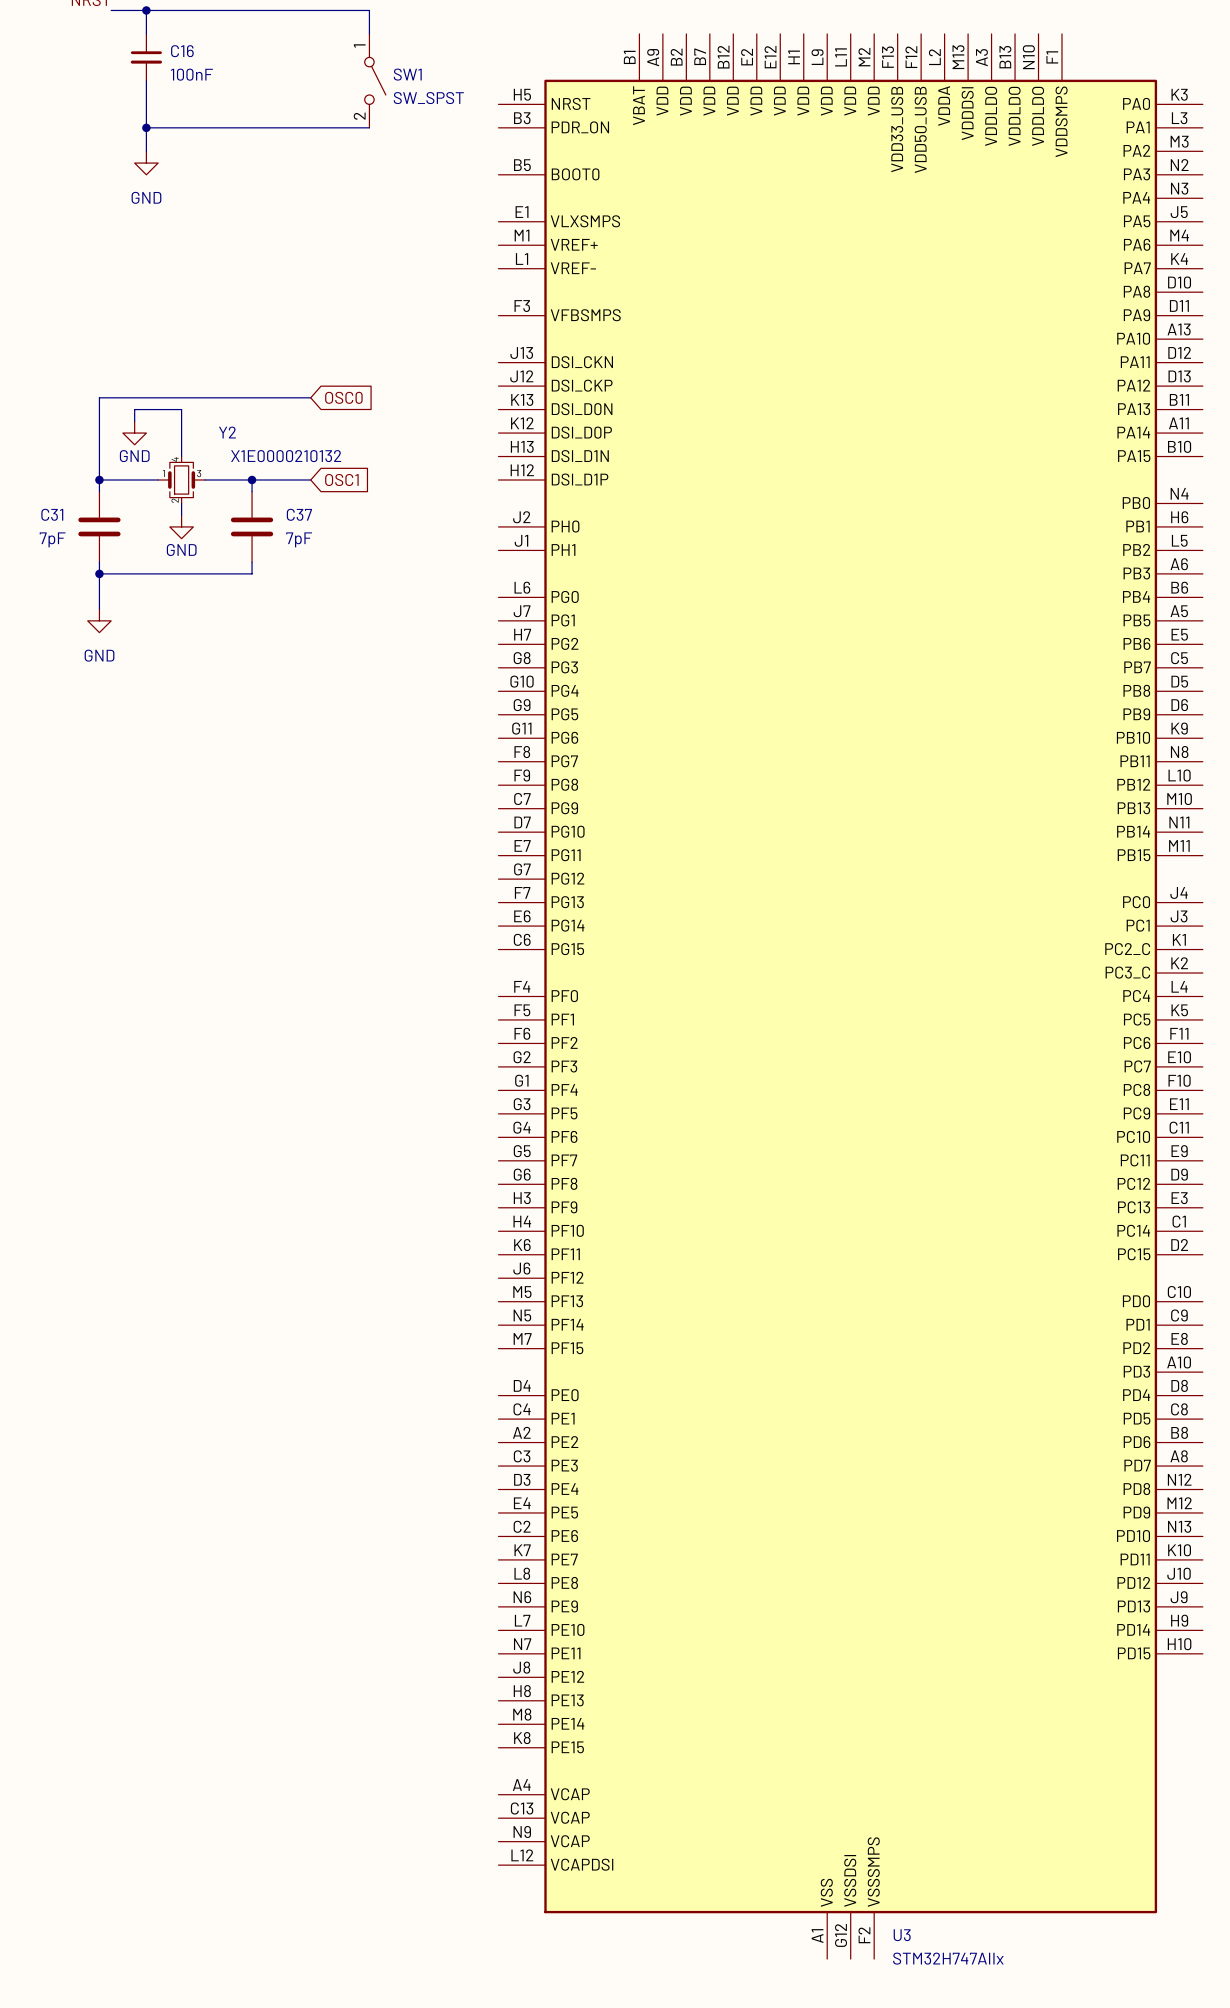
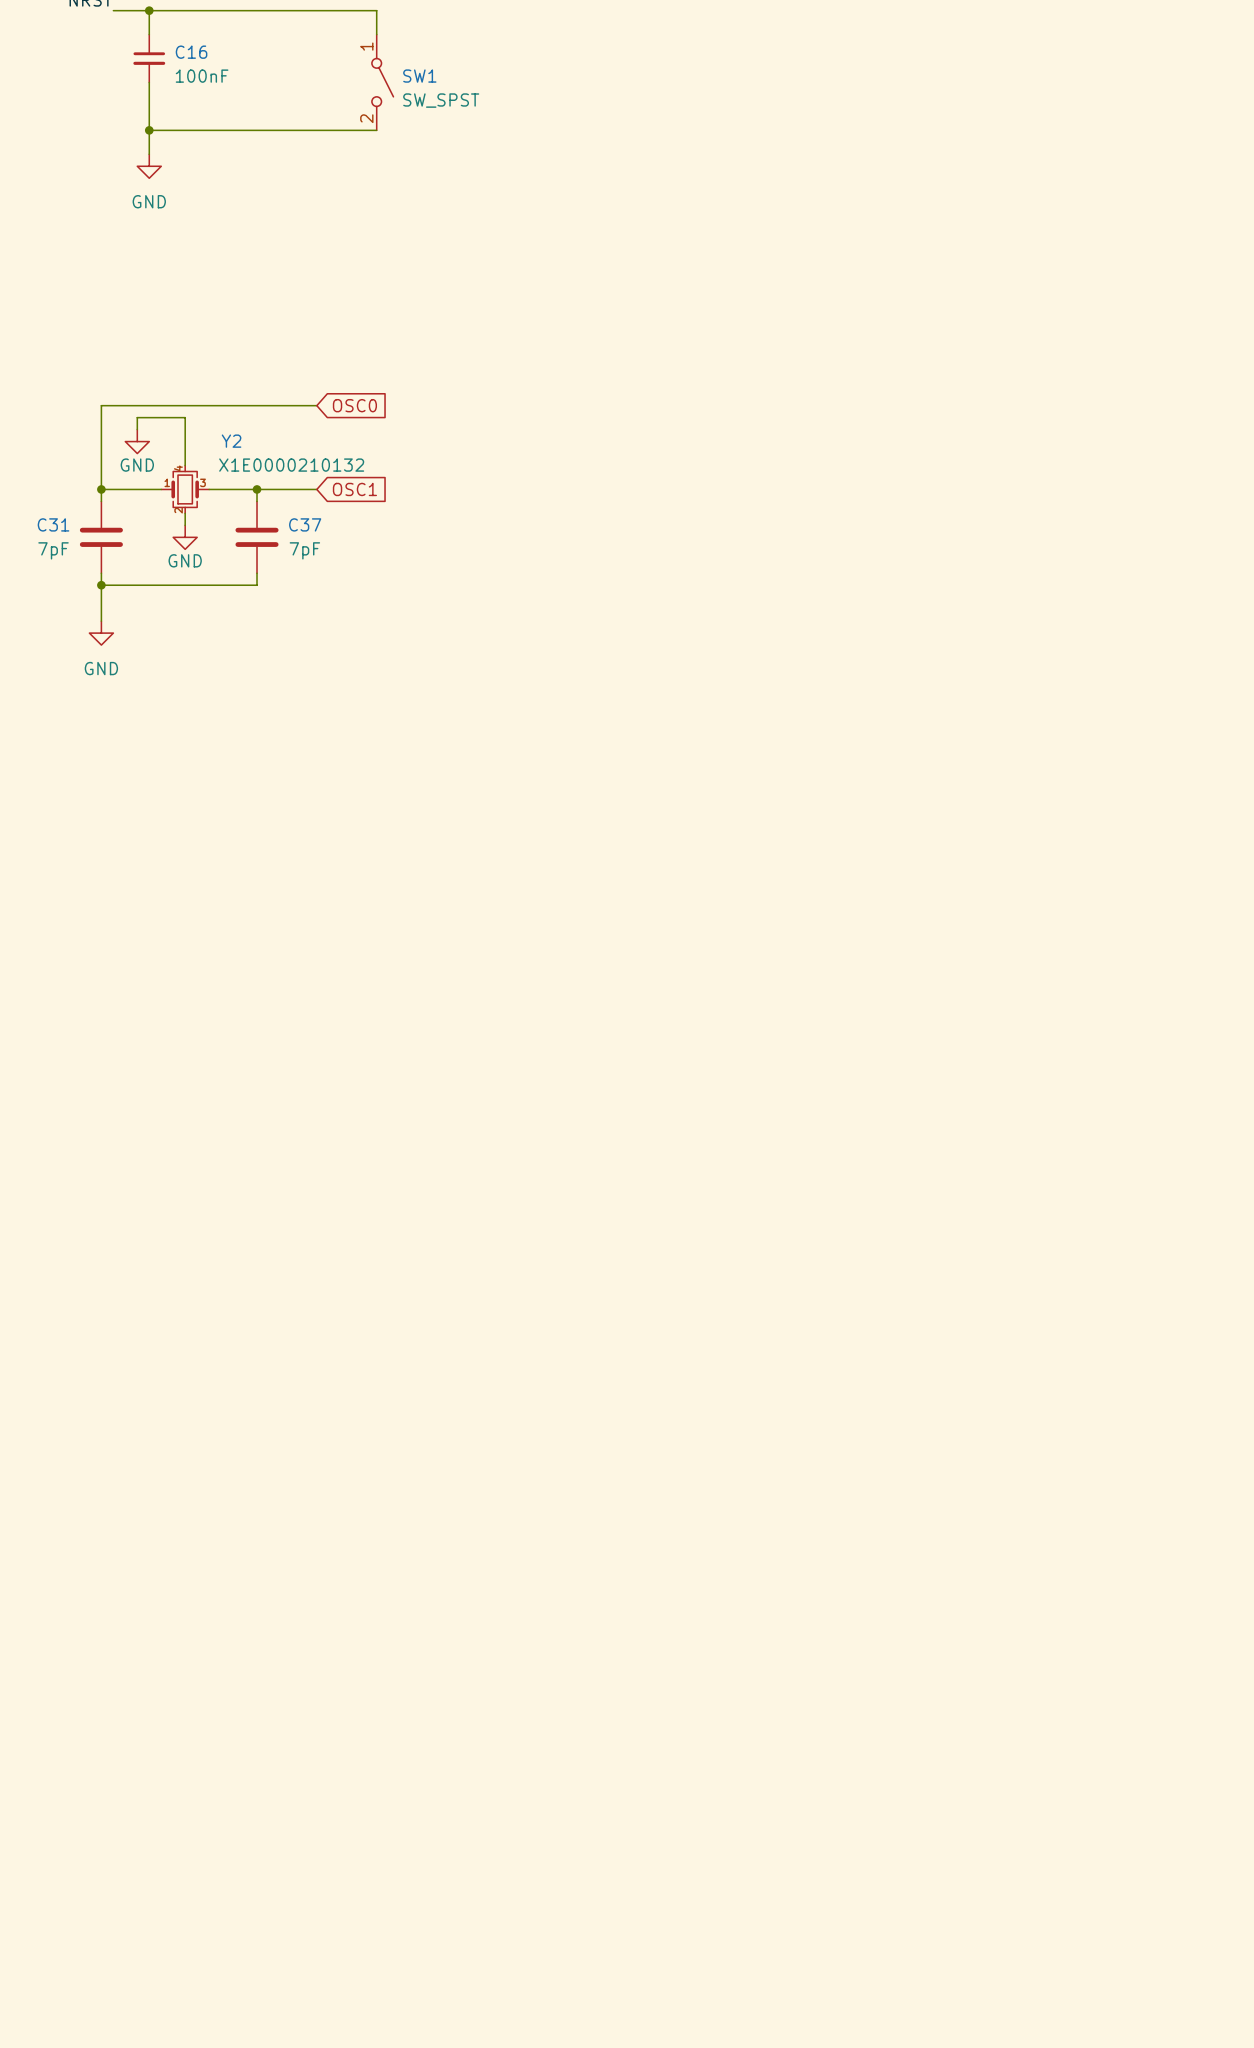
U3: STM32H747AIIx (850, 996) -> none

